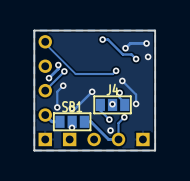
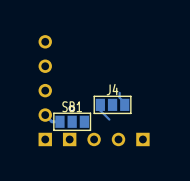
board edge: (155, 30) (155, 150) (34, 150) (34, 30) (155, 30) -> none
track: (102, 39) (108, 39) (122, 54) (131, 54) (136, 59) -> none
via: (102, 39) -> none
track: (45, 41) (75, 74) (112, 74) (116, 70) -> none
track: (146, 43) (130, 43) (125, 48) -> none
via: (146, 43) -> none
via: (125, 48) -> none
via: (148, 56) -> none
via: (136, 59) -> none
via: (58, 65) -> none
track: (58, 68) (49, 78) -> none
via: (116, 70) -> none
track: (64, 71) (45, 90) -> none
via: (64, 71) -> none
via: (49, 78) -> none
track: (122, 80) (136, 94) (136, 103) -> none
via: (122, 80) -> none
track: (63, 85) (57, 91) (57, 107) -> none
via: (63, 85) -> none
track: (92, 91) (75, 108) (71, 108) -> none
via: (92, 91) -> none
via: (119, 92) -> none
via: (136, 103) -> none
via: (112, 104) -> none
via: (57, 107) -> none
track: (124, 117) (118, 123) (118, 139) (108, 139) (90, 121) (84, 121) -> none
via: (124, 117) -> none
via: (109, 119) -> none
via: (71, 127) -> none
via: (110, 130) -> none

